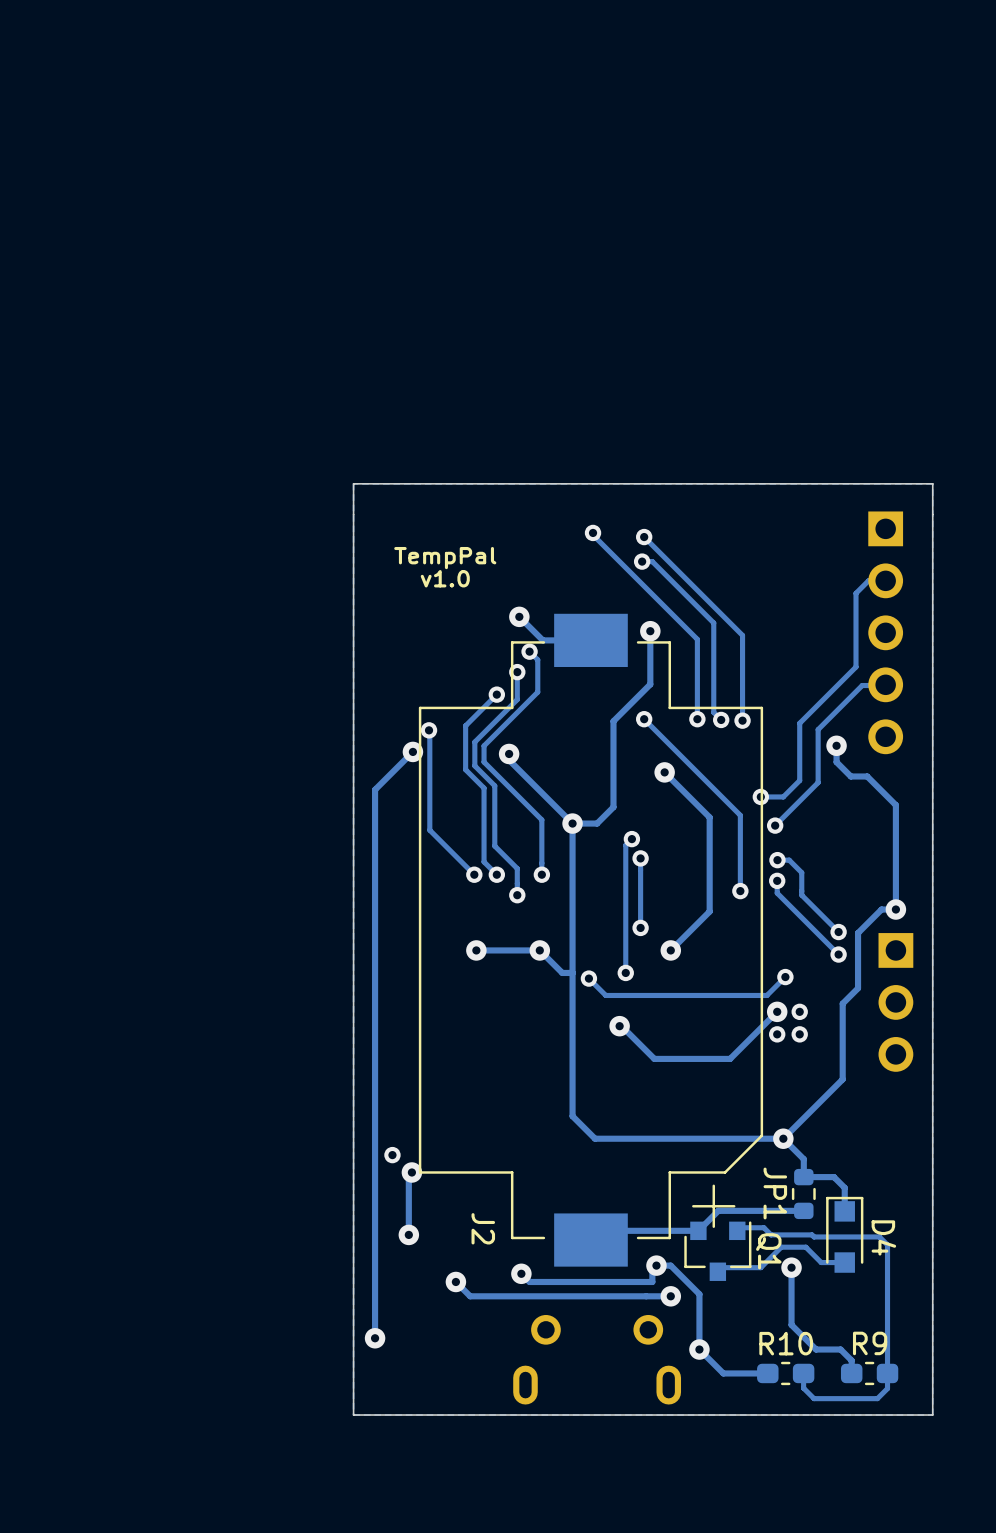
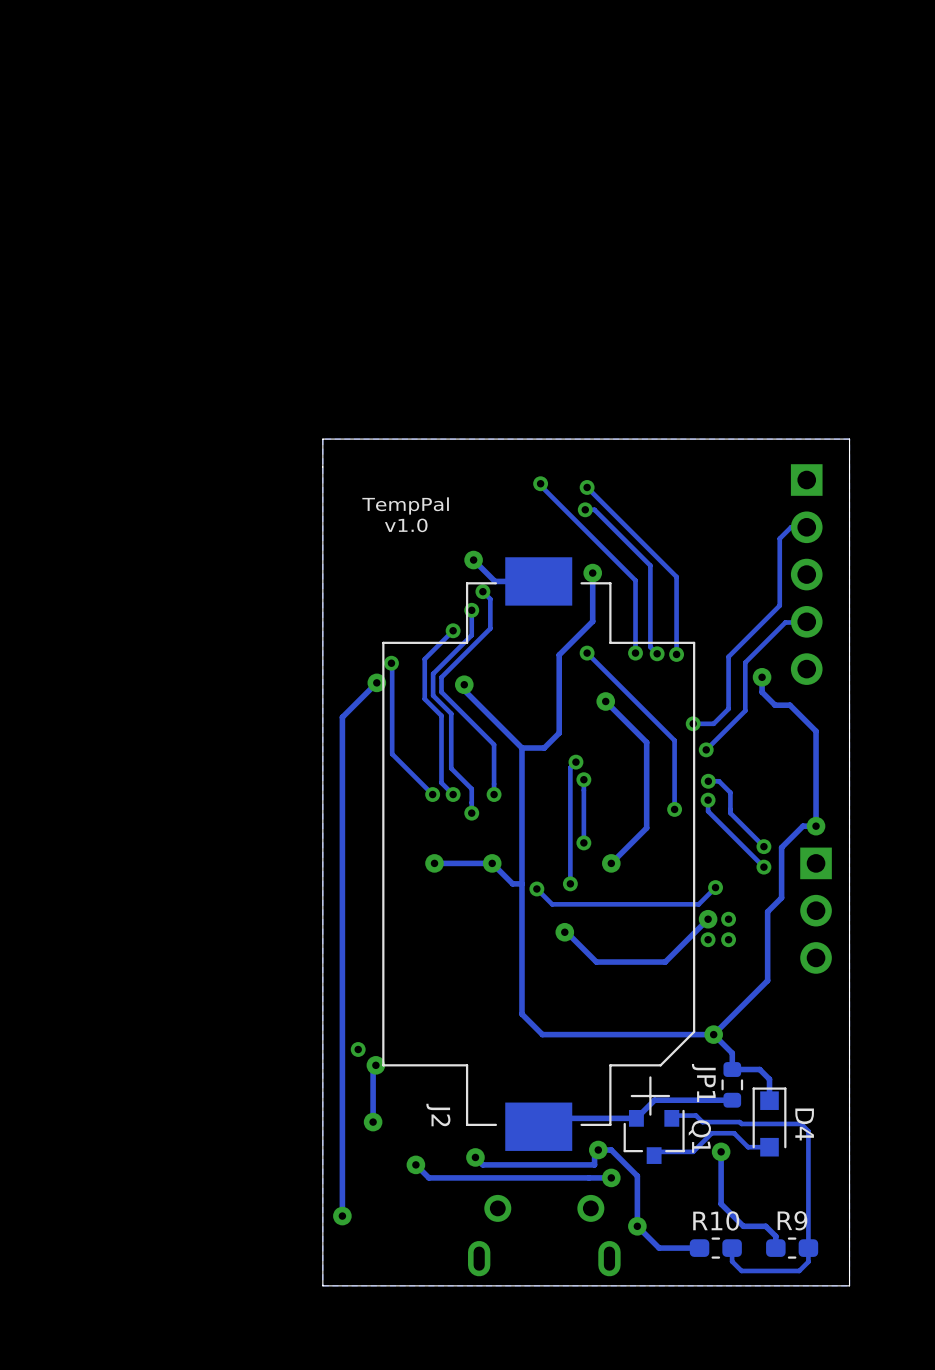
via: (572, 823) -> none

